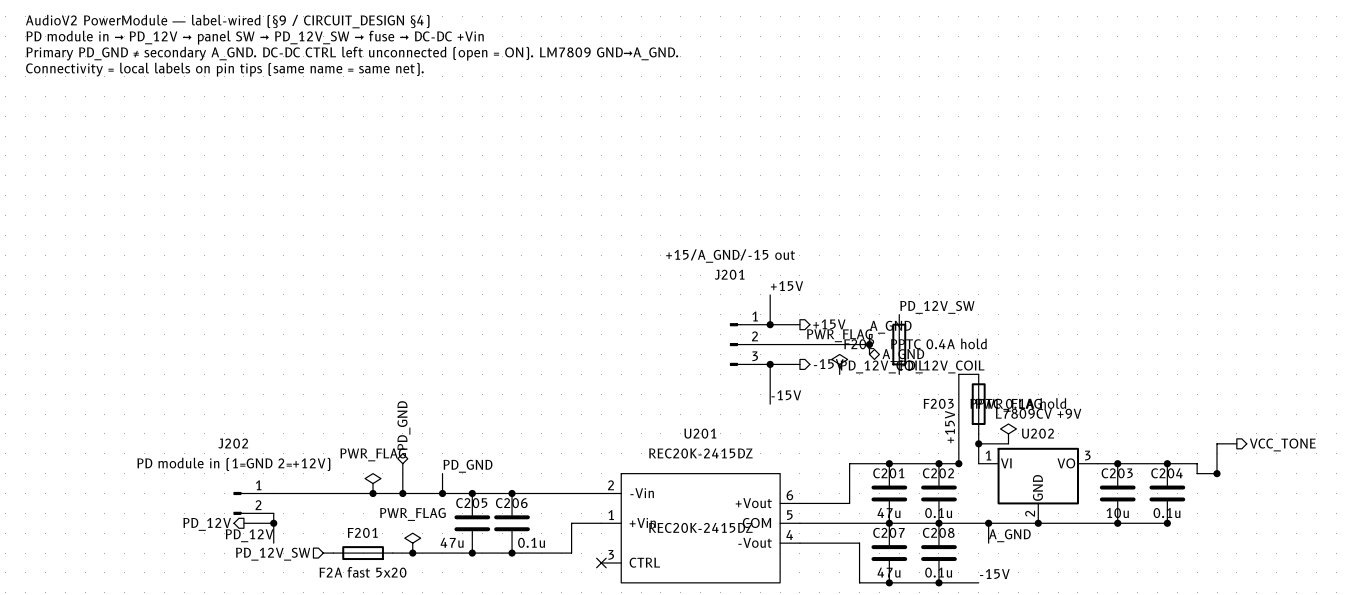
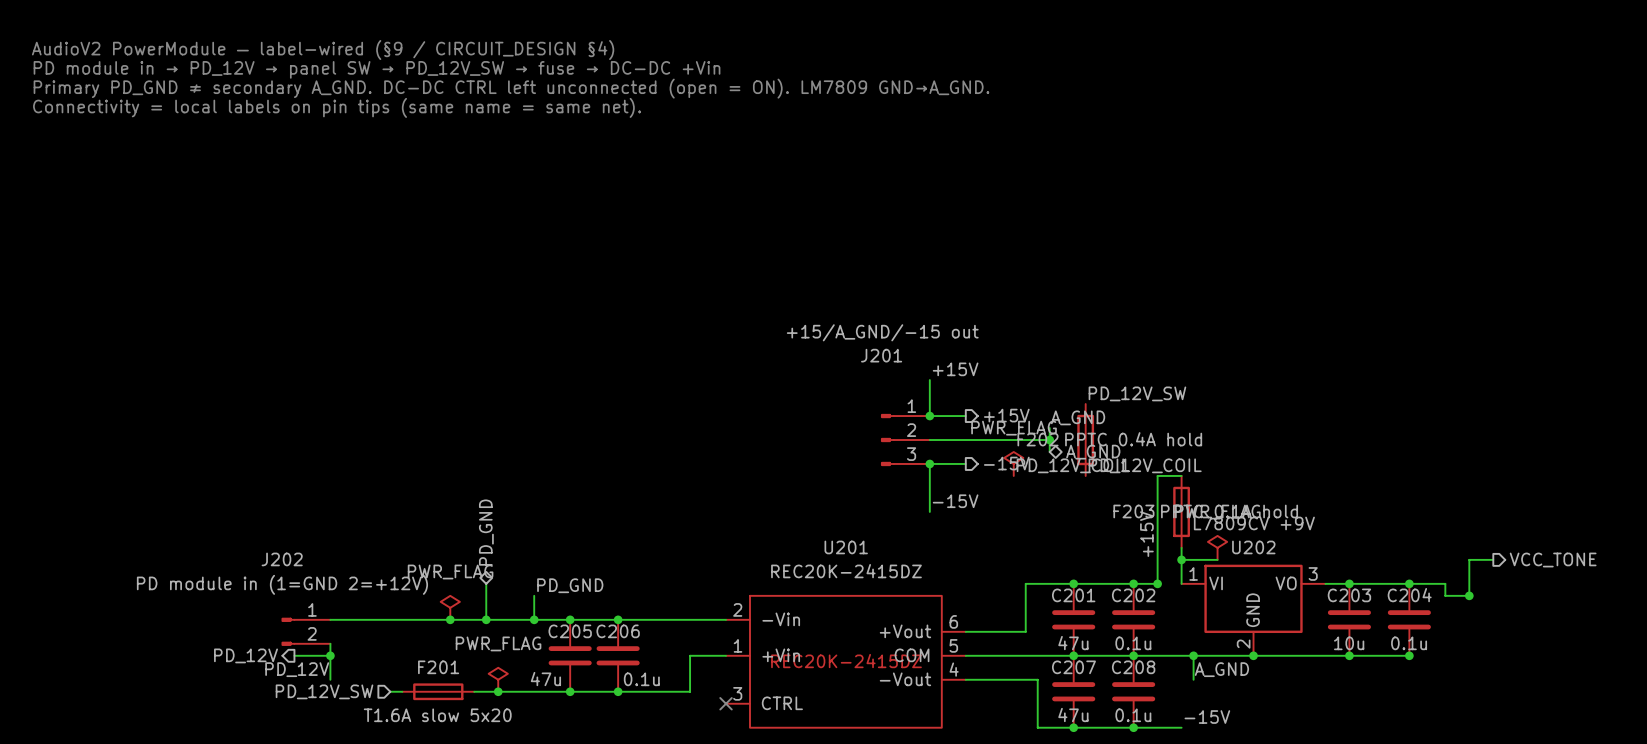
F201 value: F2A fast 5x20 (362, 572) -> T1.6A slow 5x20 (437, 715)

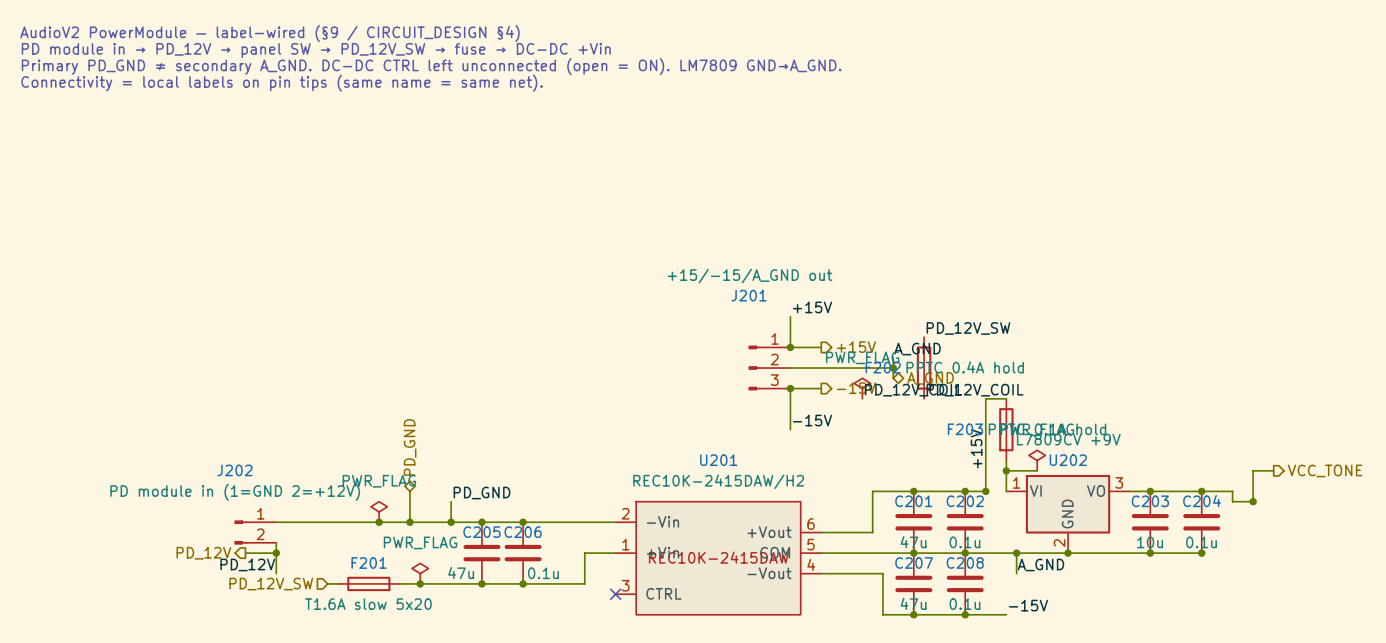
J201 value: +15/A_GND/-15 out (882, 332) -> +15/-15/A_GND out (750, 276)
U201 value: REC20K-2415DZ (846, 571) -> REC10K-2415DAW/H2 (718, 481)
U201 text: REC20K-2415DZ (846, 661) -> REC10K-2415DAW (718, 557)

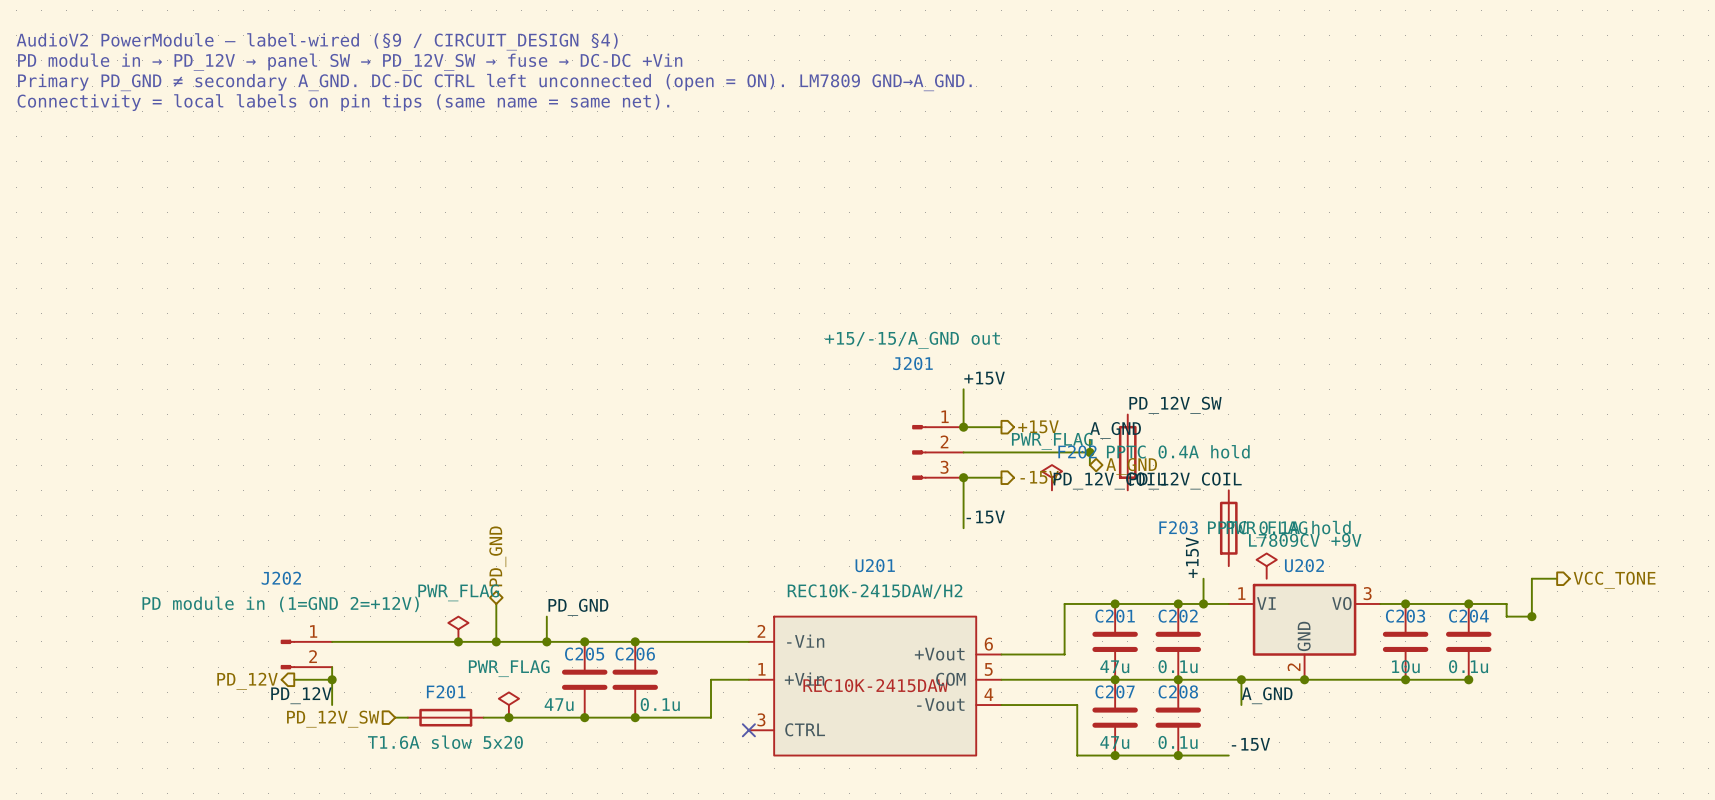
wire: (1006, 398) (985, 398) (985, 470) -> none
wire: (1006, 460) (1006, 491) -> (1203, 603) (1228, 603)
wire: (1006, 470) (1037, 470) -> none
junction: (1006, 470) -> none

